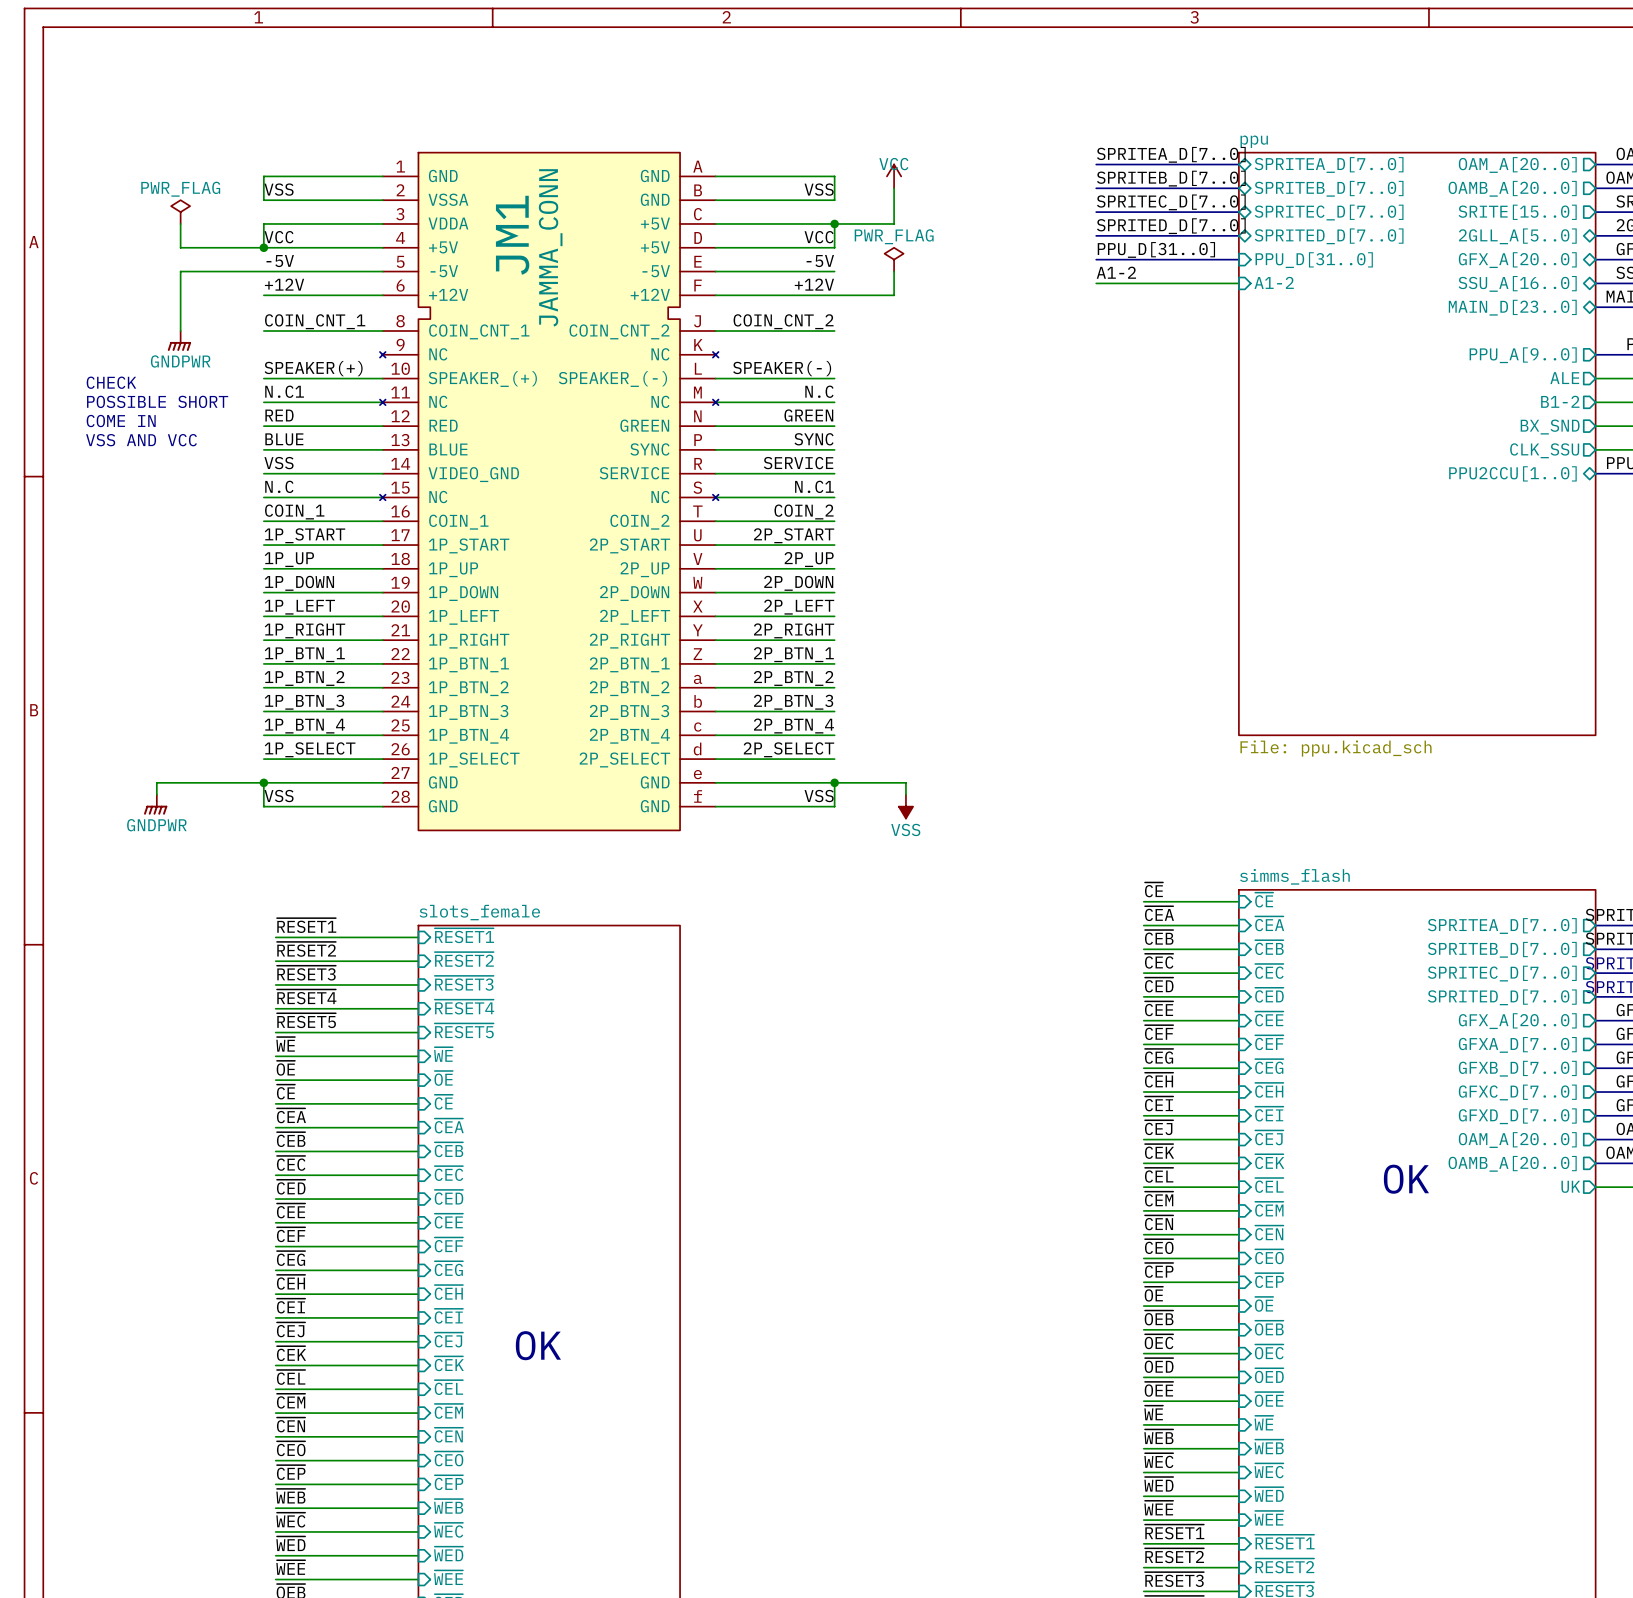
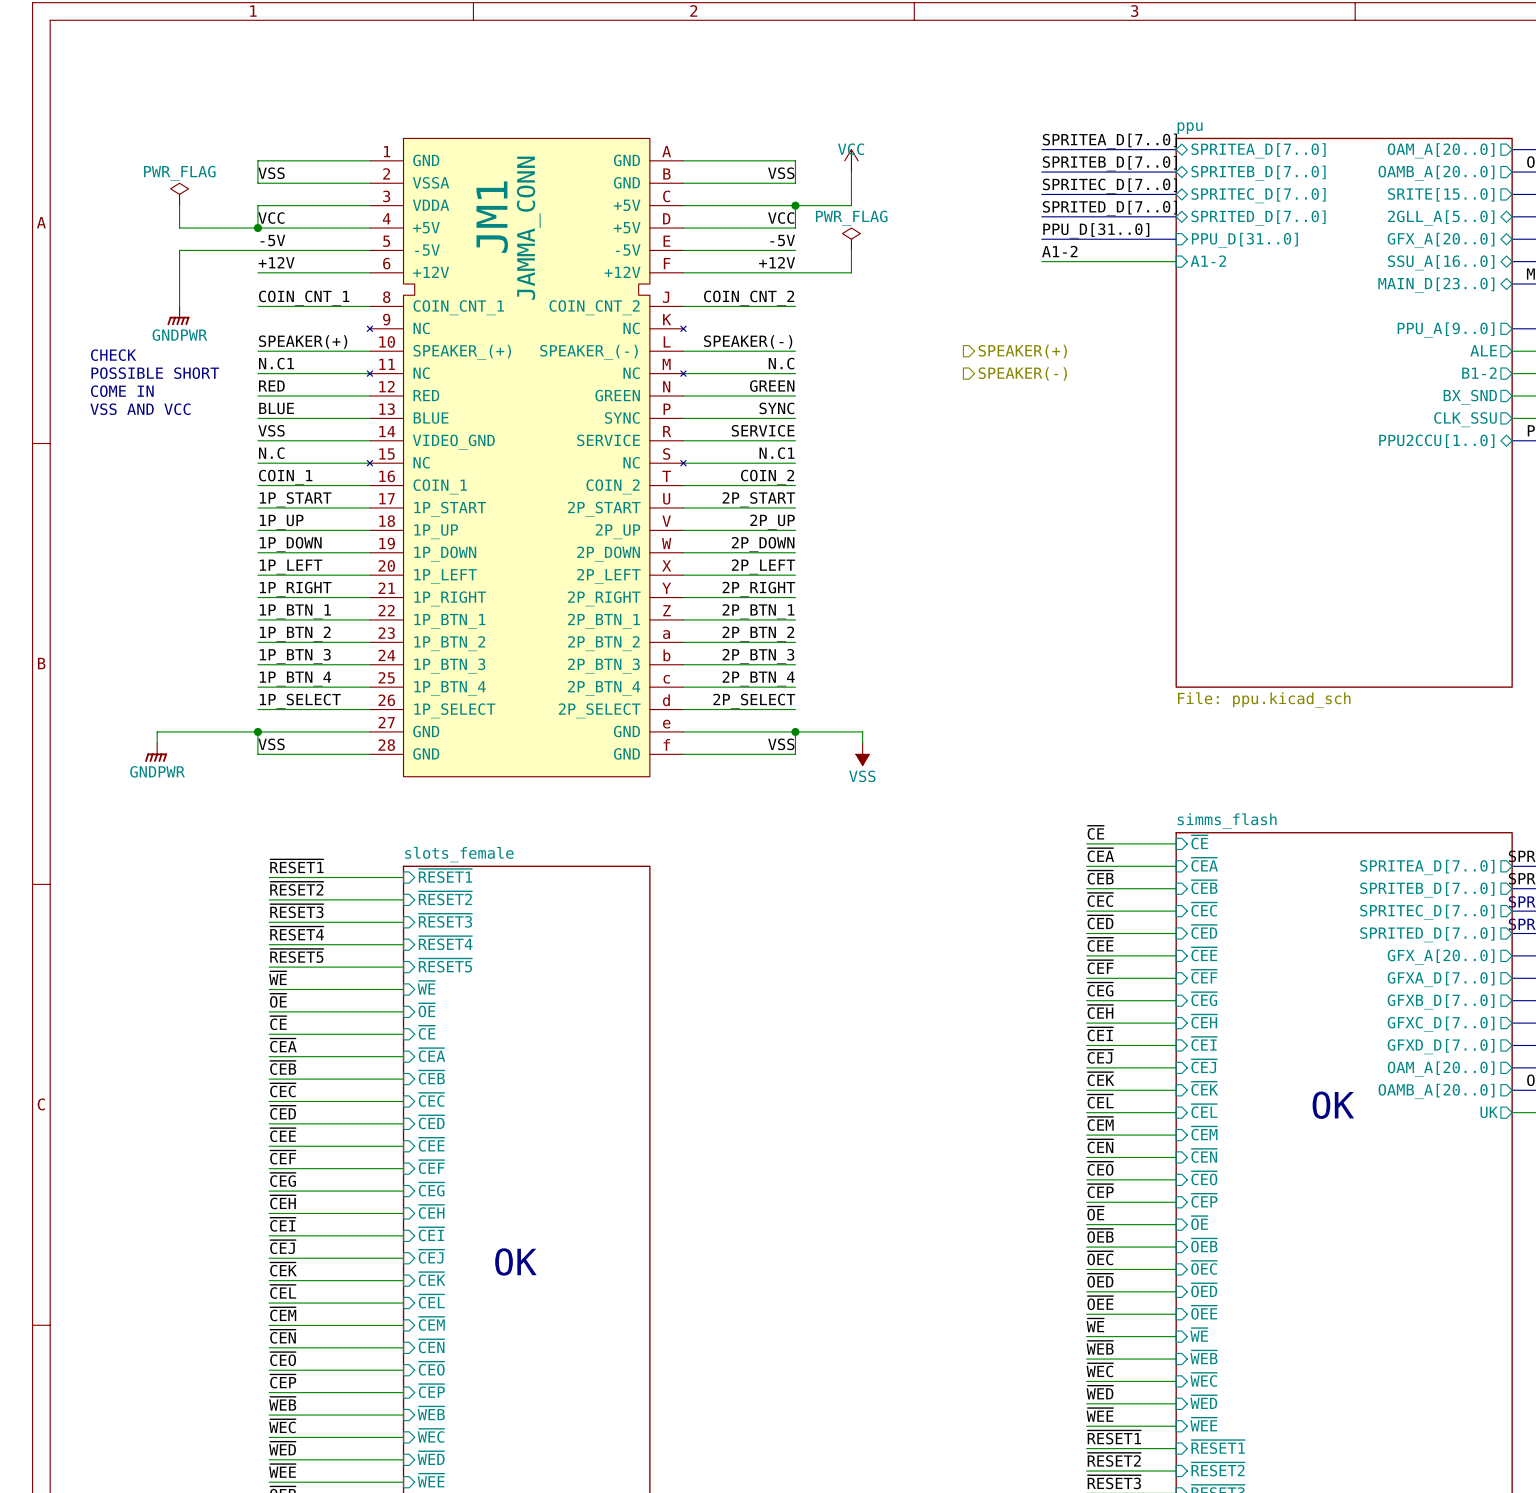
hierarchical label: none -> SPEAKER(+) (1022, 351)
hierarchical label: none -> SPEAKER(-) (1022, 373)

